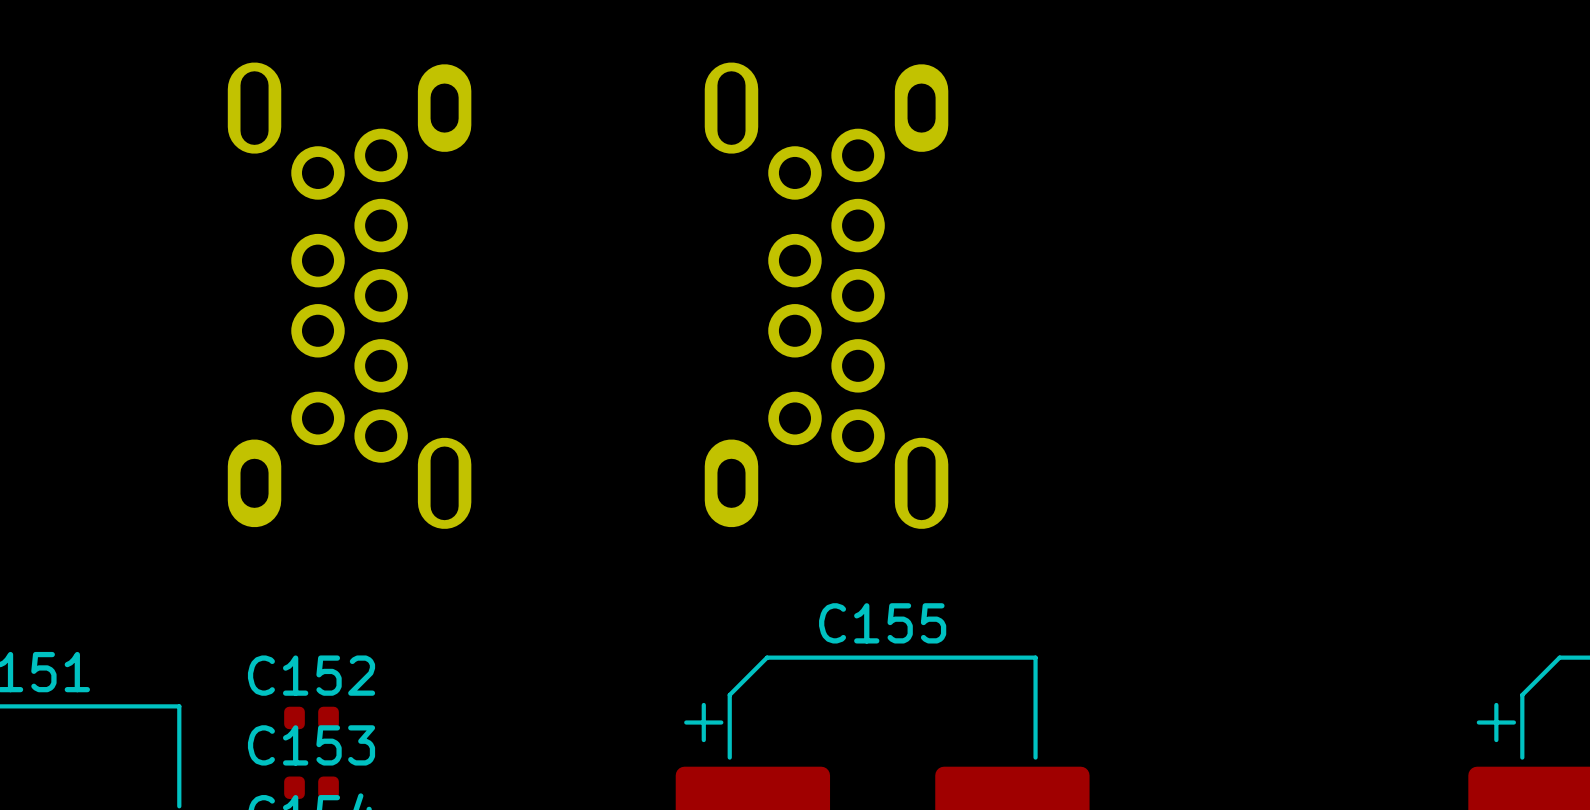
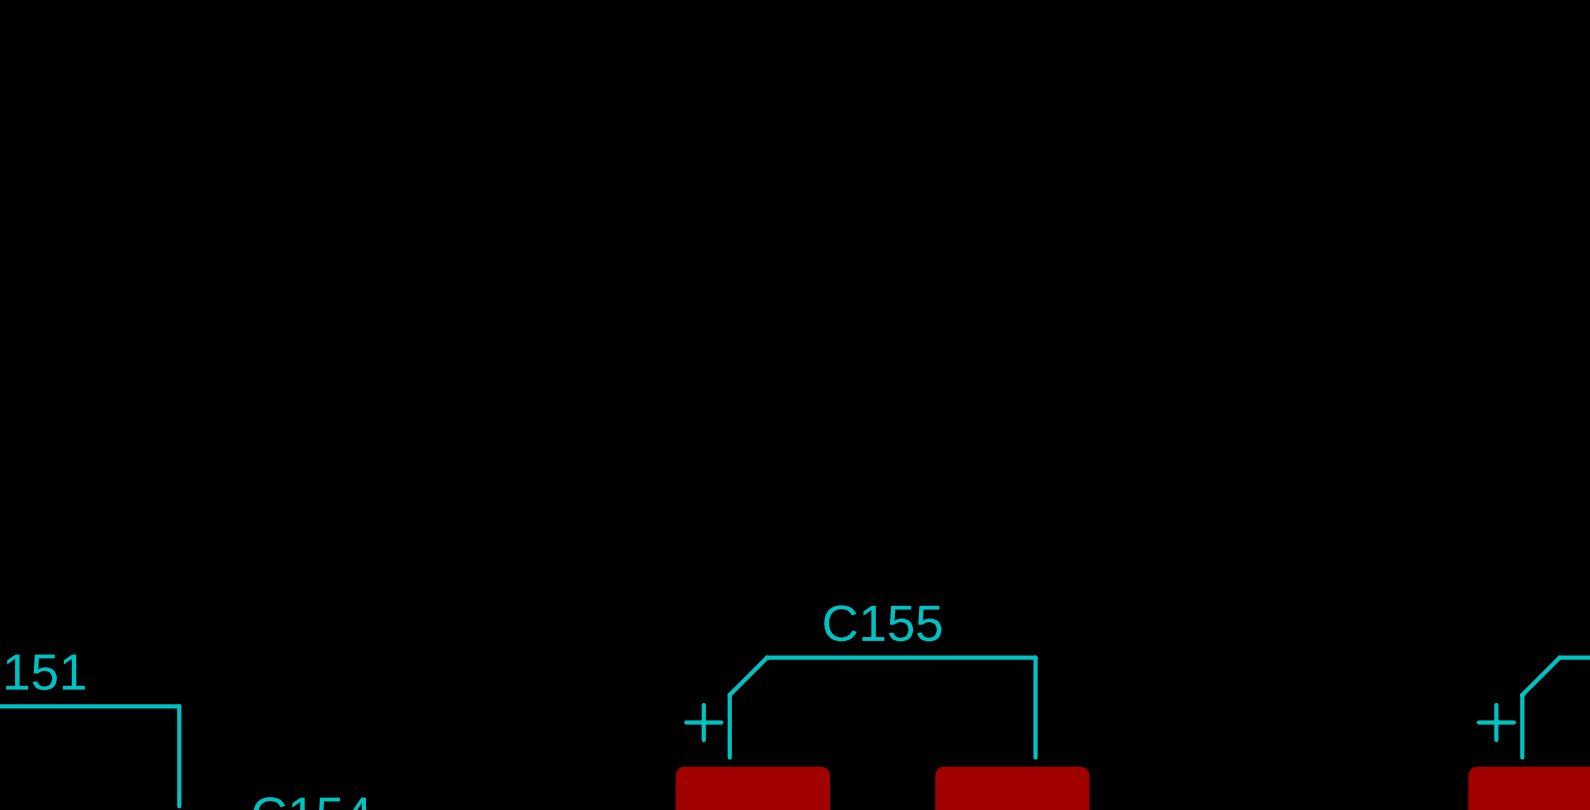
part: (349, 295) -> none
part: (826, 295) -> none
C152: (311, 717) -> none
C153: (311, 787) -> none

